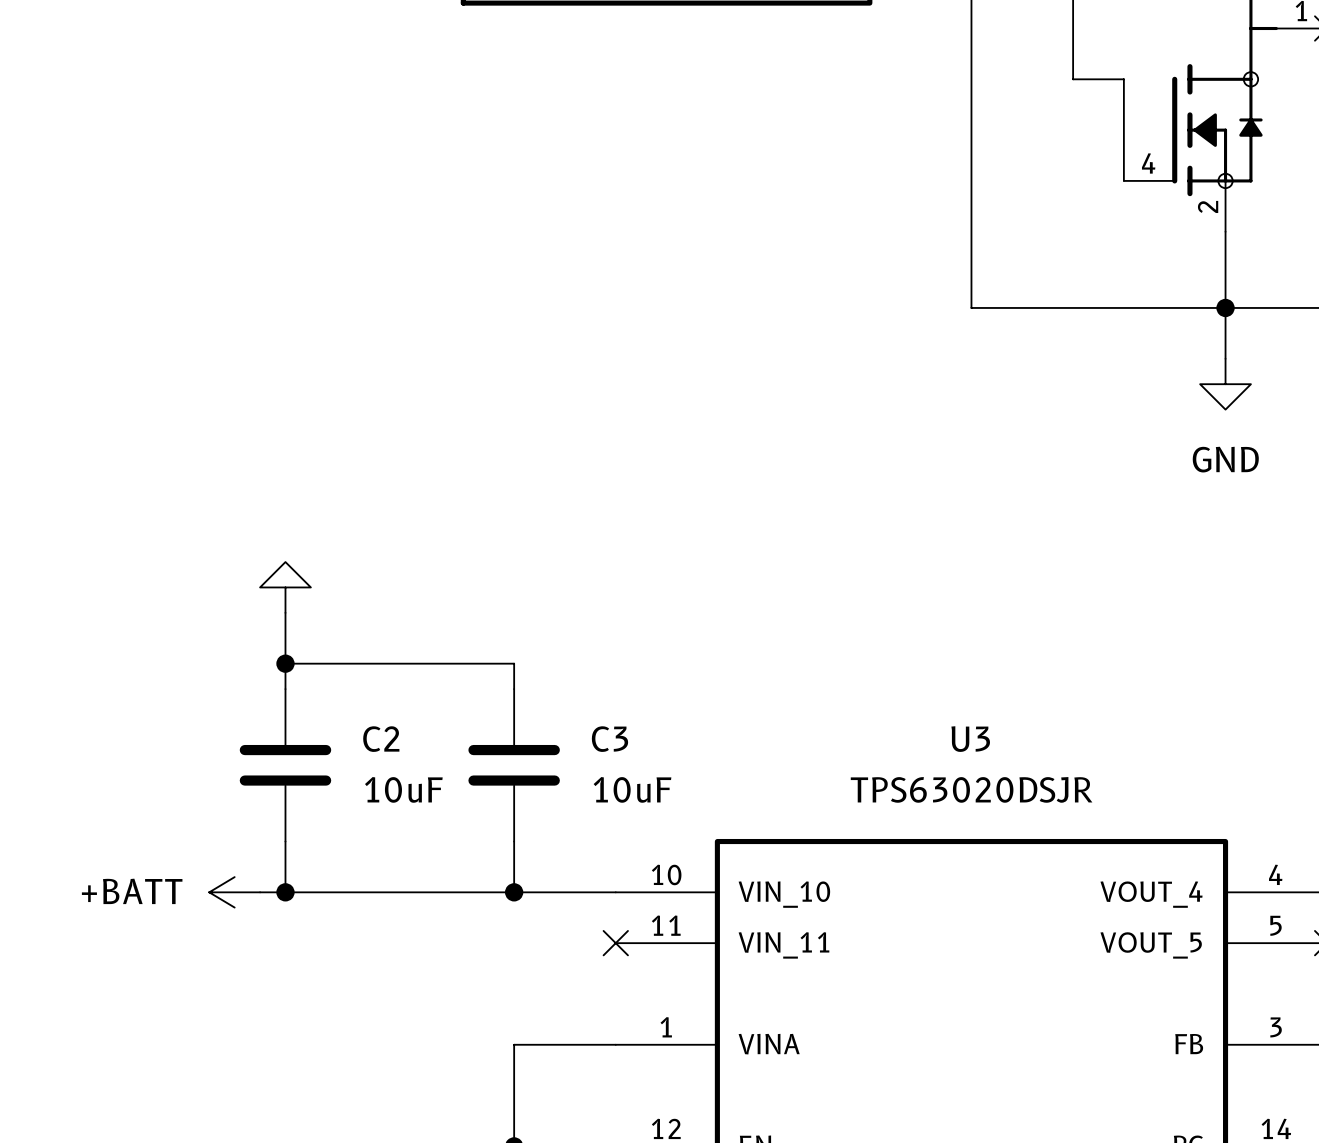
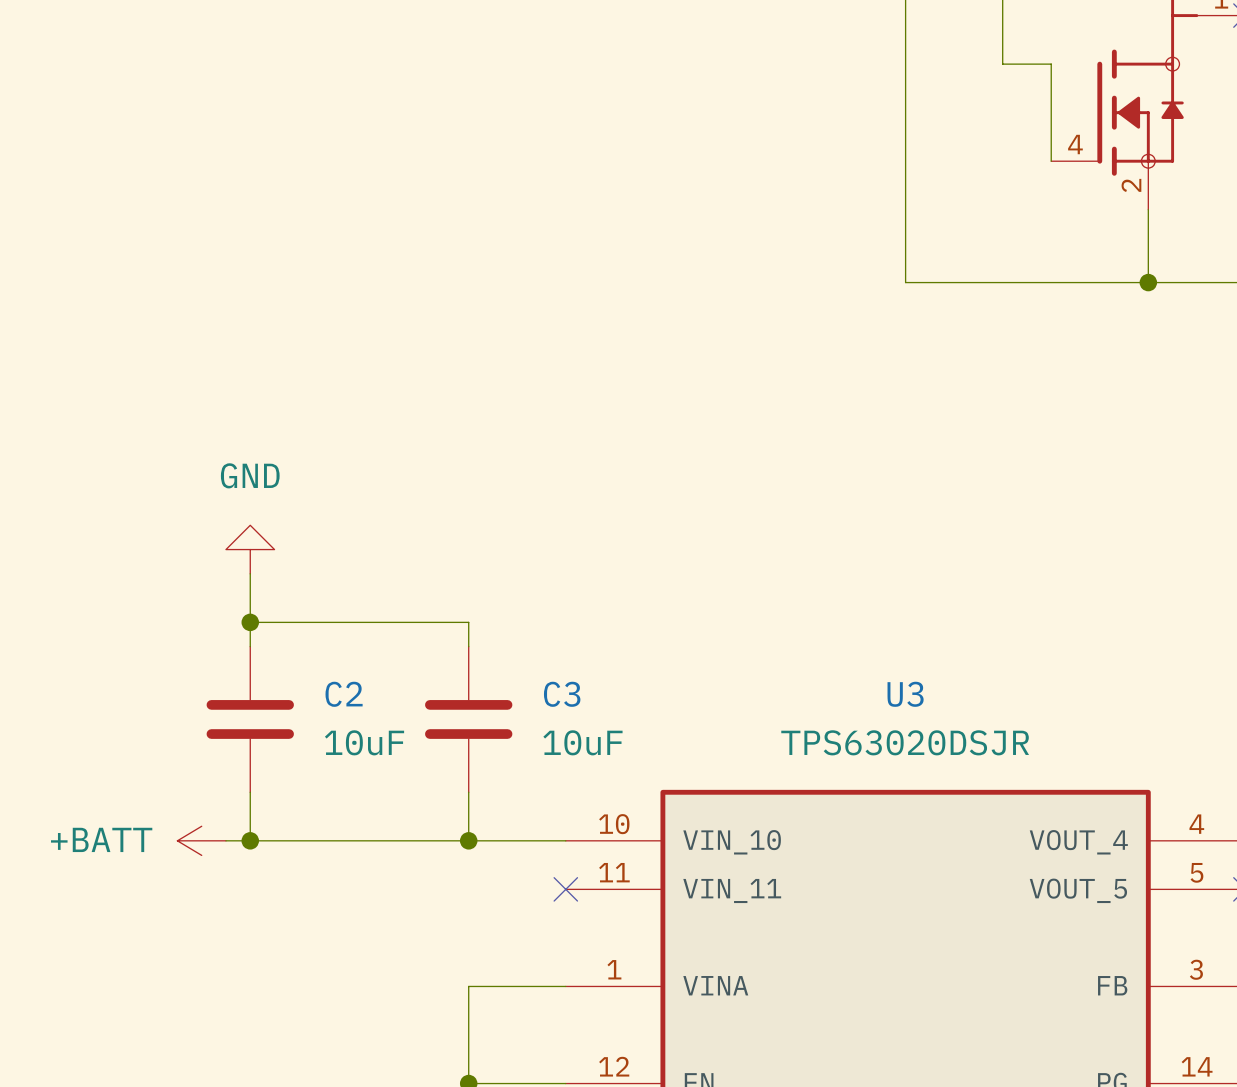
wire: (1225, 307) (1225, 358) -> none
power symbol: GND (1225, 384) -> none
power symbol text: none -> GND (250, 475)

